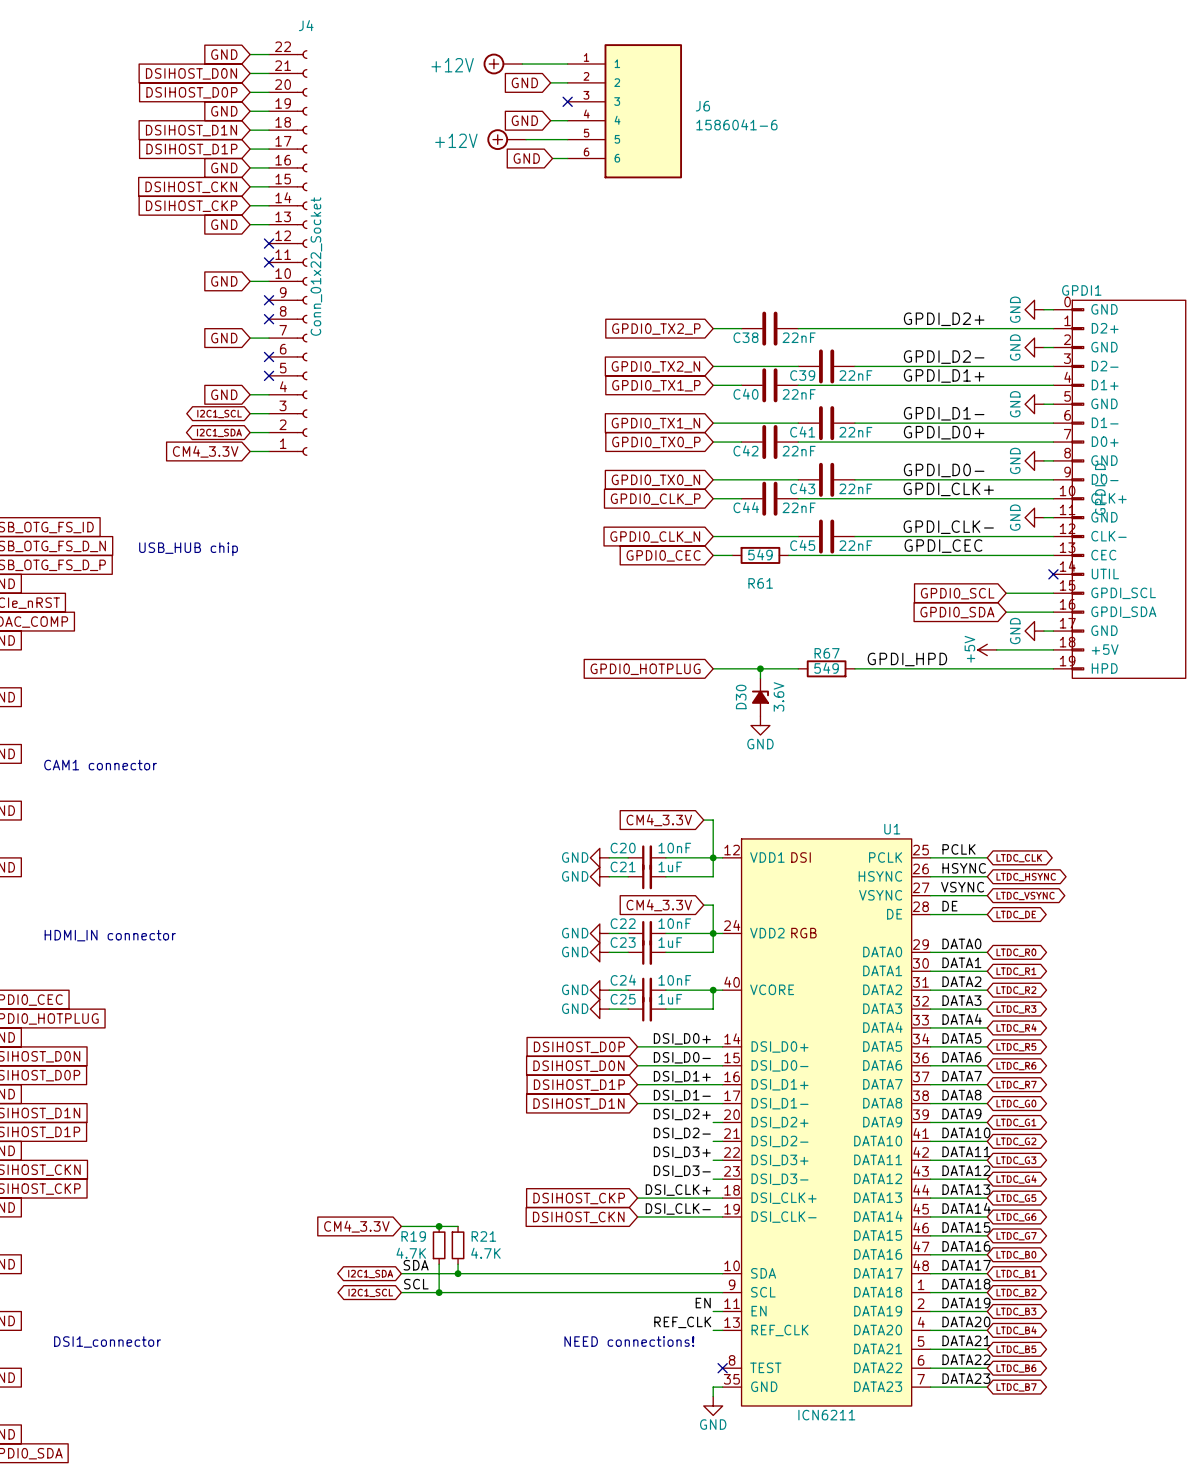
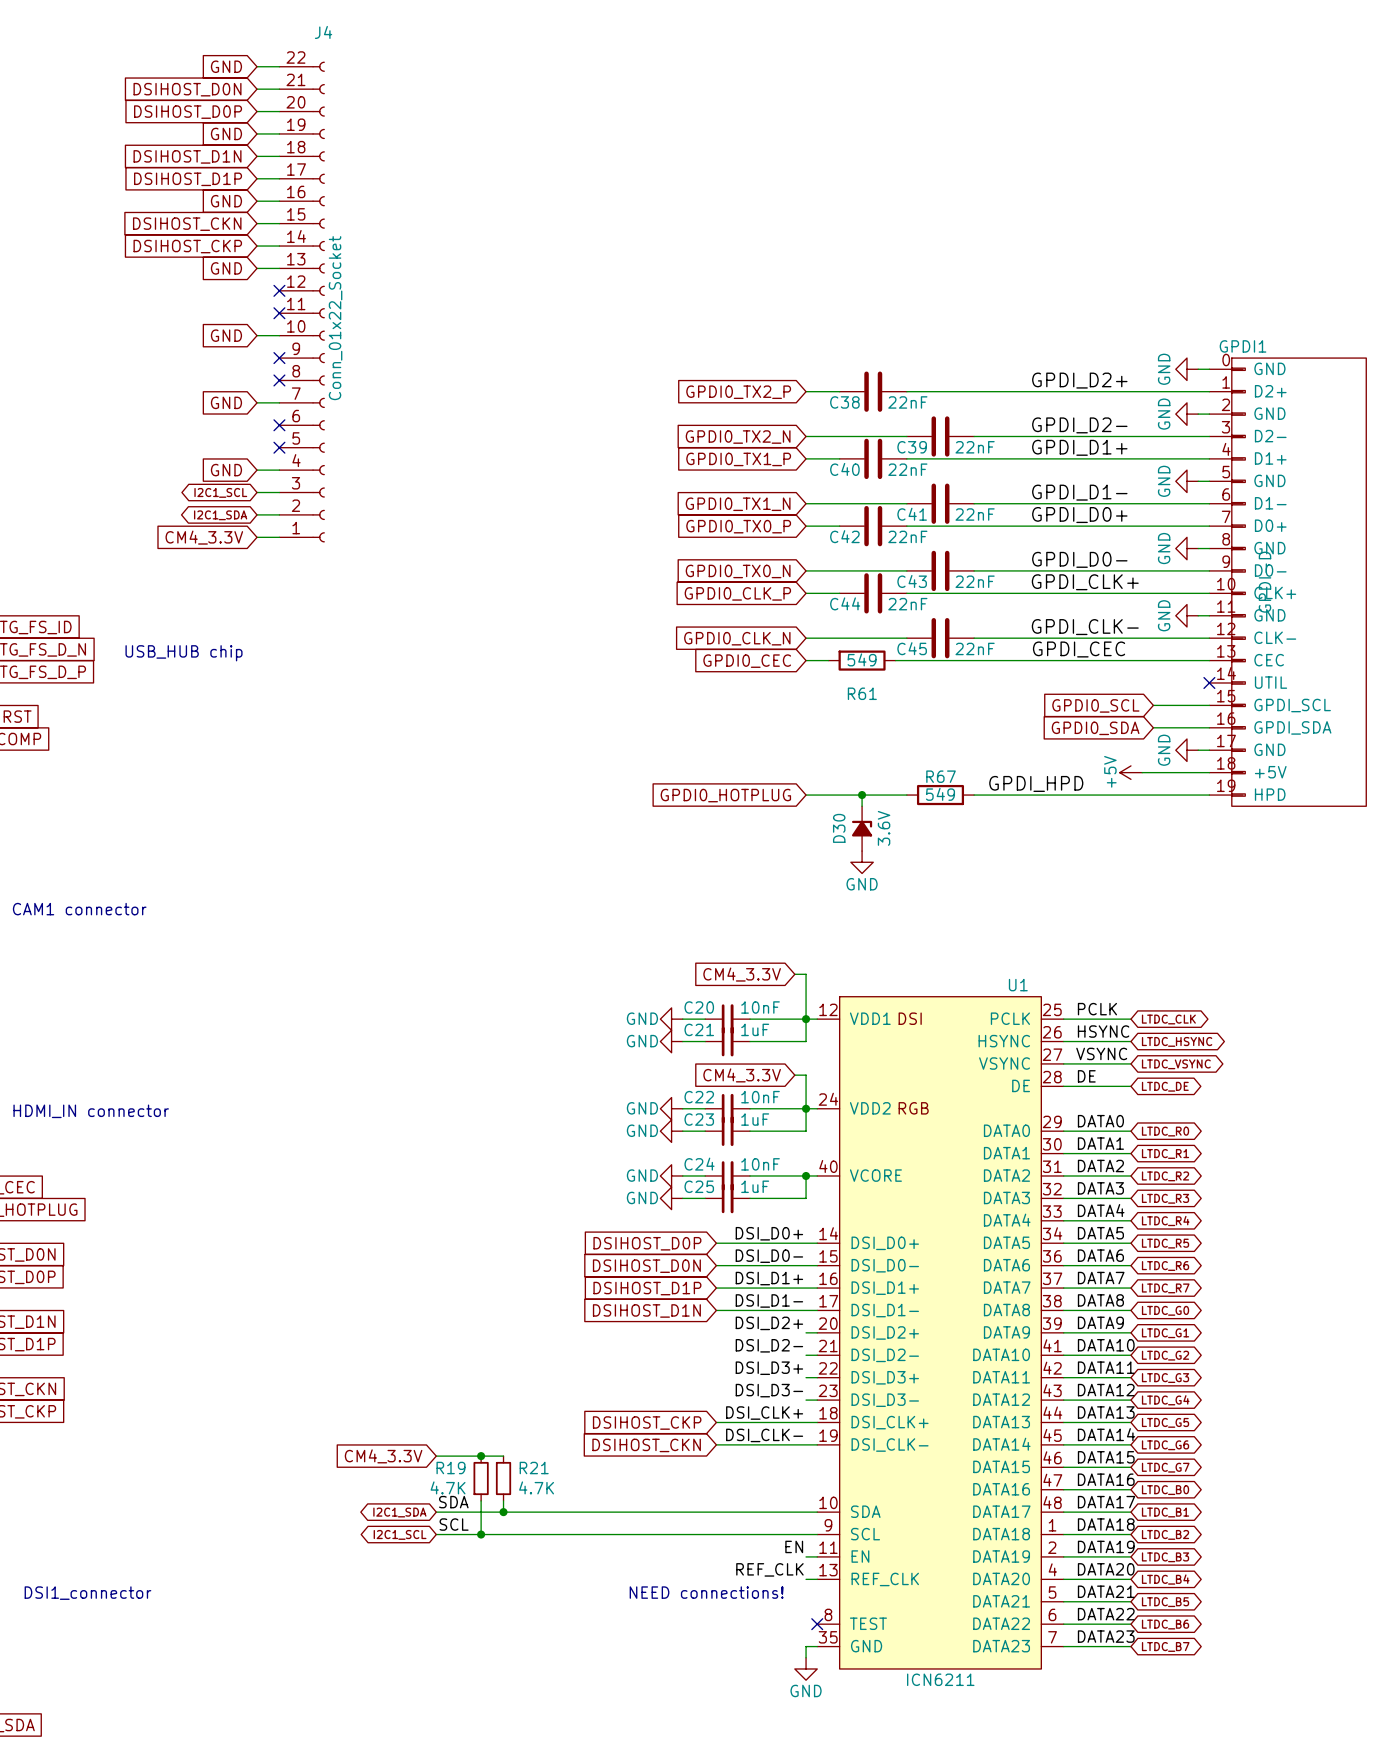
power symbol: +12V (502, 64) -> none
wire: (522, 64) (567, 64) -> none
global label: GND (524, 82) -> none
wire: (550, 82) (567, 82) -> none
no-connect mark: (567, 101) -> none
J6: 1586041-6 (624, 111) -> none
global label: GND (524, 120) -> none
wire: (550, 120) (567, 120) -> none
power symbol: +12V (506, 139) -> none
wire: (526, 139) (567, 139) -> none
global label: GND (526, 158) -> none
wire: (552, 158) (567, 158) -> none

